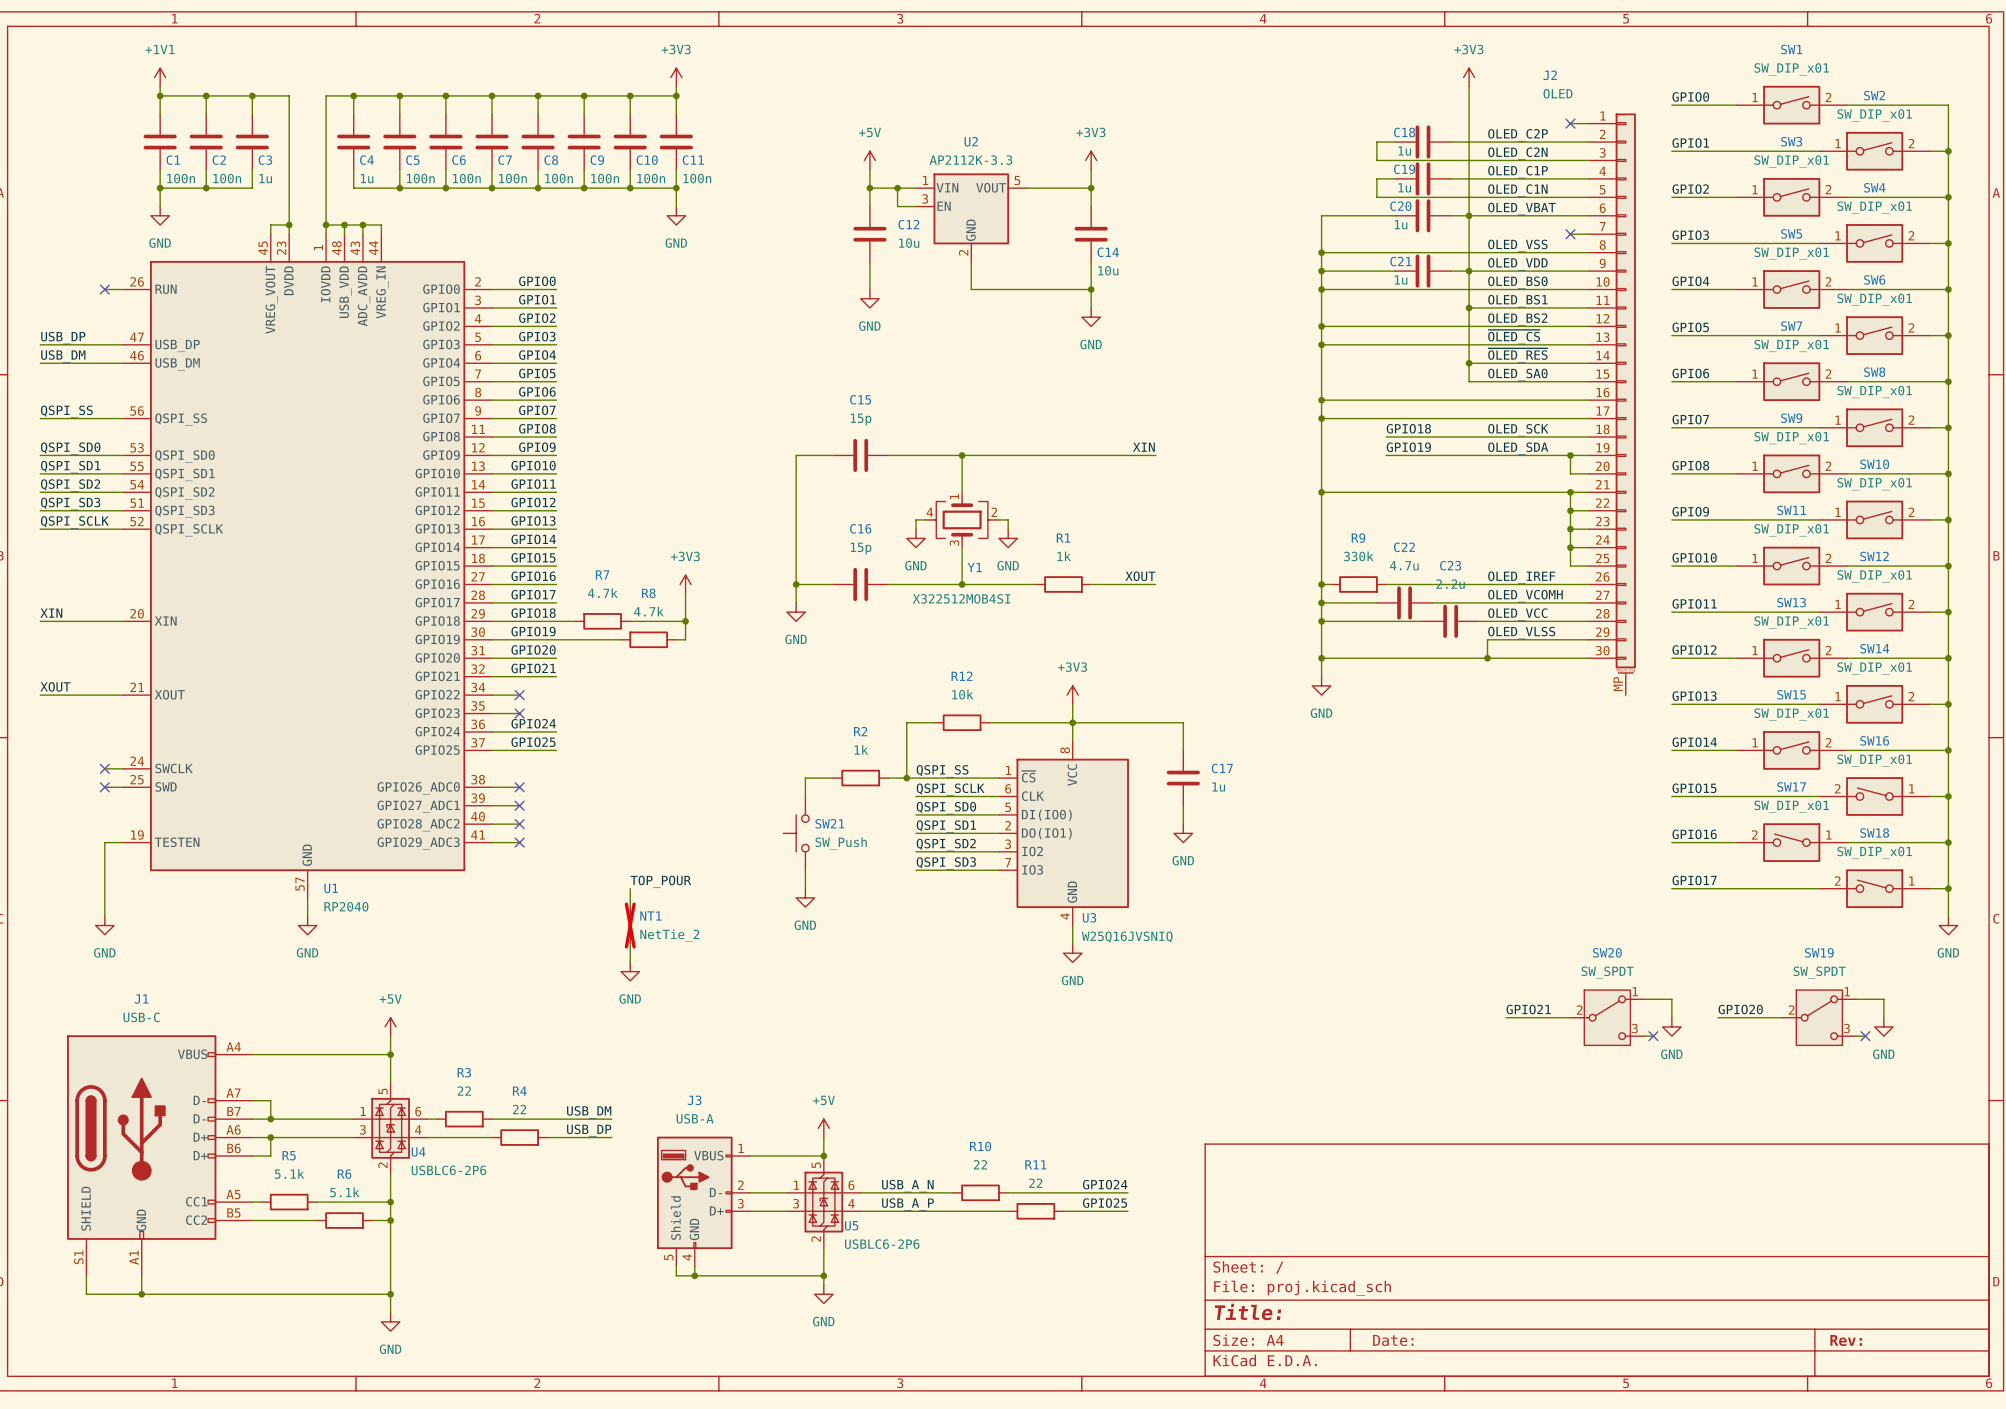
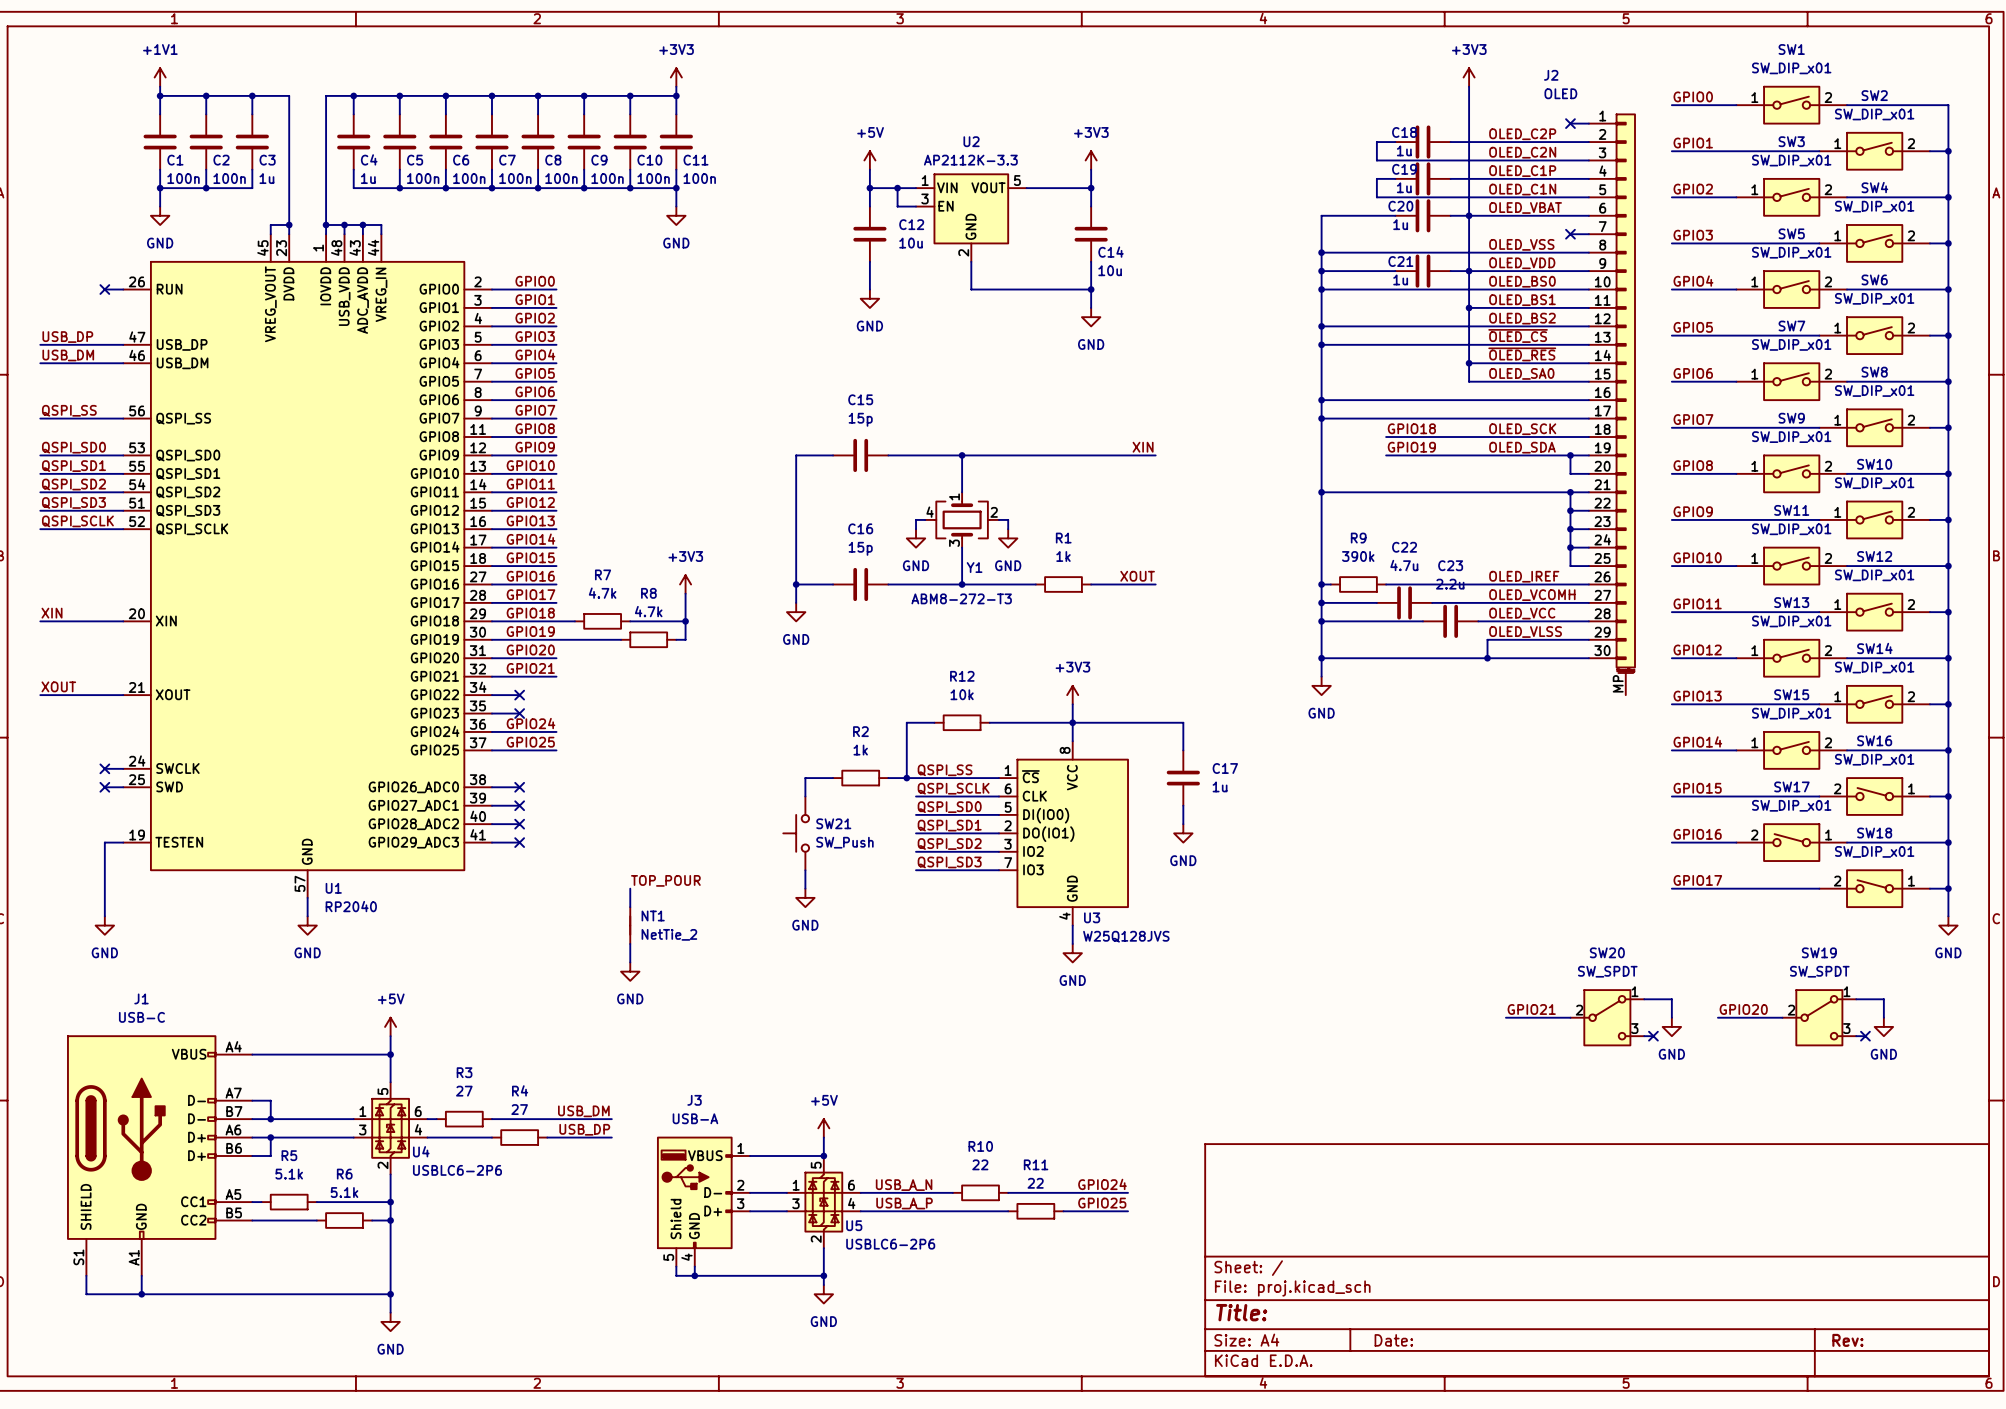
R9 value: 330k (1358, 556) -> 390k (1358, 556)
Y1 value: X322512MOB4SI (961, 598) -> ABM8-272-T3 (961, 598)
NT1 do-not-place cross: (630, 925) -> none
U3 value: W25Q16JVSNIQ (1127, 937) -> W25Q128JVS (1126, 936)
R3 value: 22 (464, 1091) -> 27 (464, 1091)
R4 value: 22 (519, 1109) -> 27 (519, 1109)

